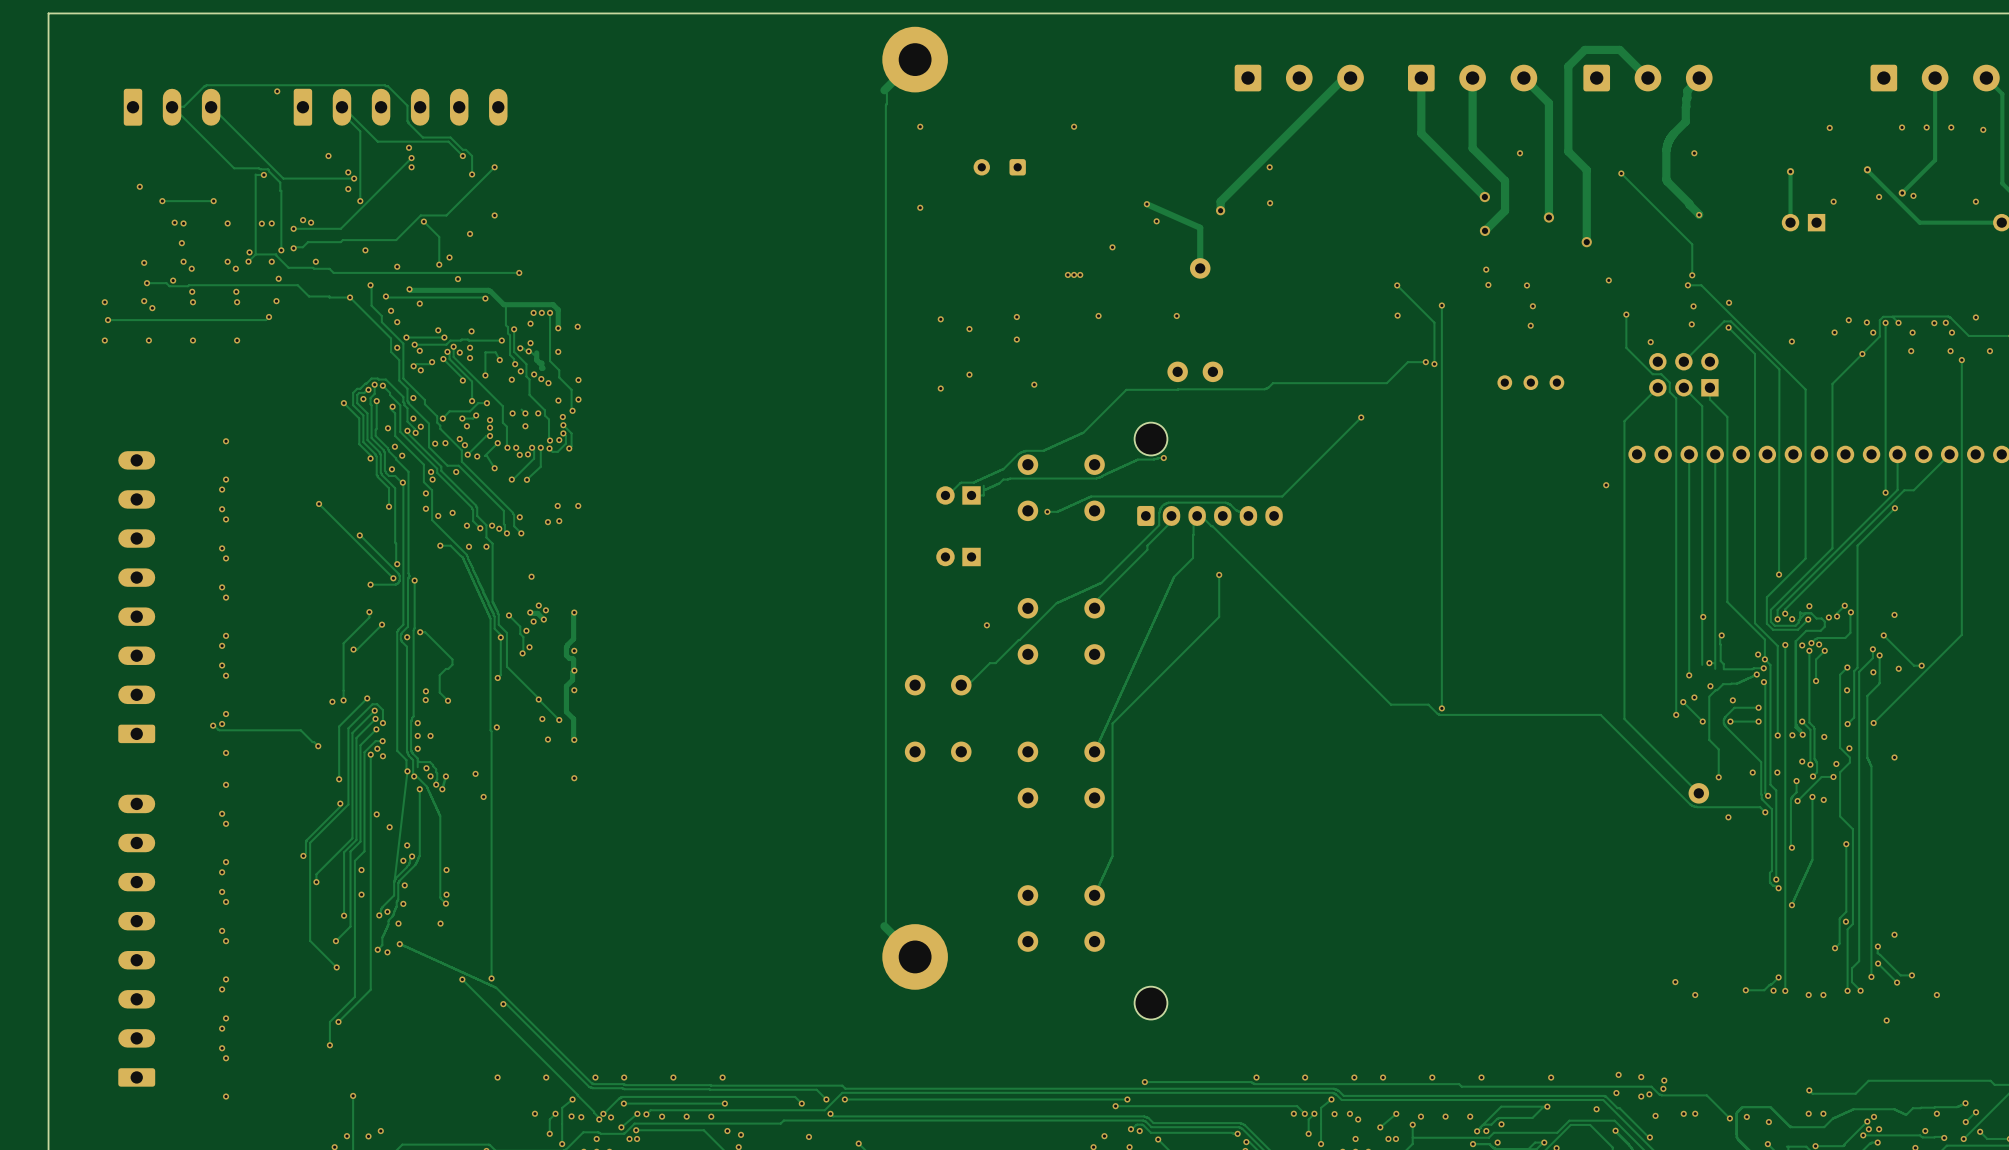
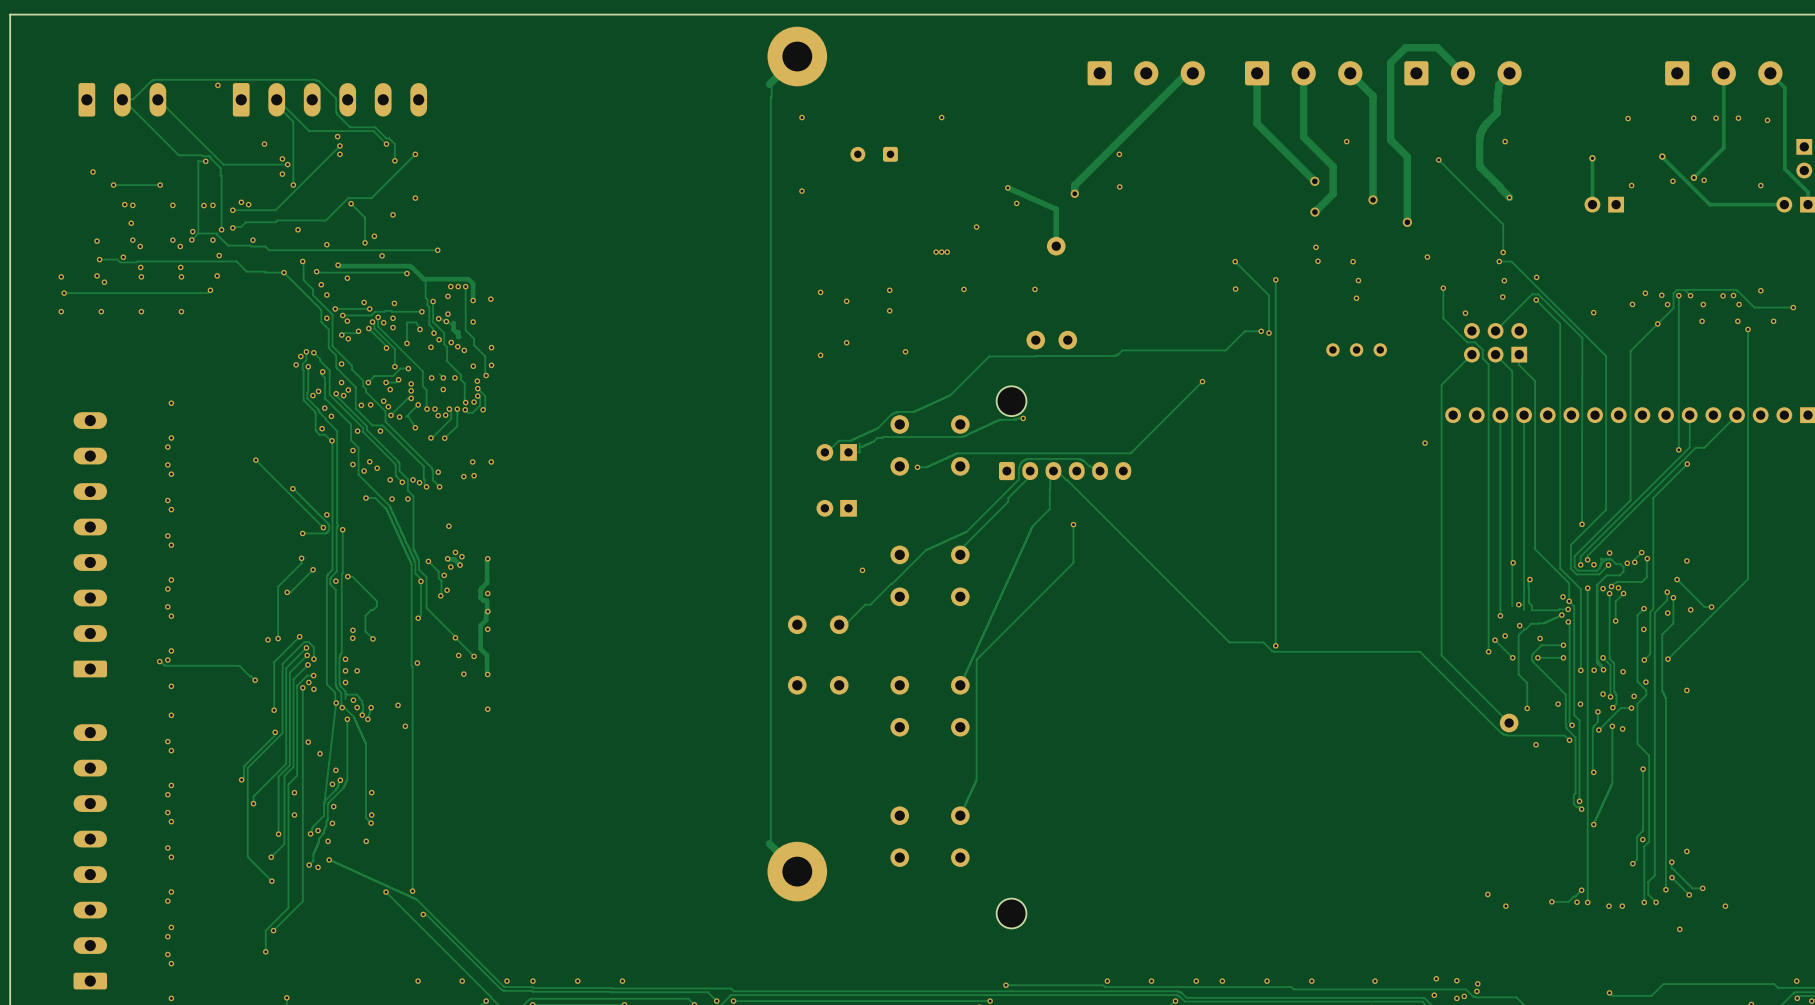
track: (368, 389) (357, 394) (357, 403) (367, 413) (367, 440) (380, 454) (380, 472) (395, 488) (397, 564) -> none
track: (343, 403) (359, 418) (359, 444) (370, 455) (370, 458) -> none
via: (343, 403) -> none
via: none -> (312, 395)
track: (415, 432) (414, 428) (407, 421) (407, 408) (404, 405) (403, 397) (385, 379) (371, 378) (353, 392) (353, 405) (363, 415) (363, 442) (375, 454) (376, 474) (389, 488) (389, 506) -> none
via: (370, 458) -> none
via: (432, 479) -> none
via: none -> (369, 461)
via: (389, 506) -> none

